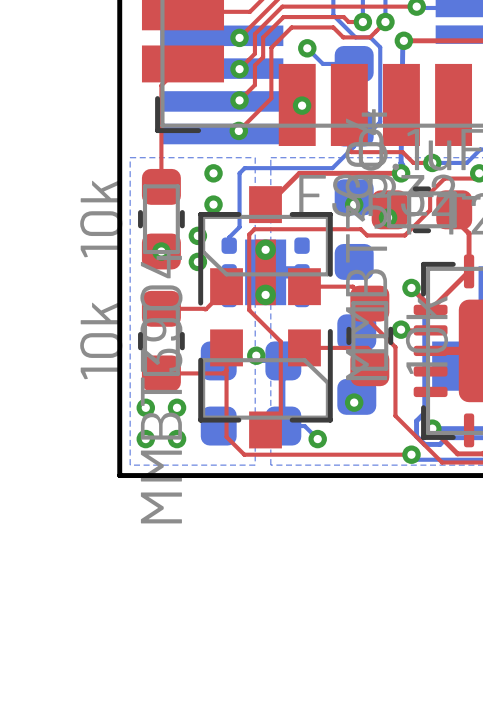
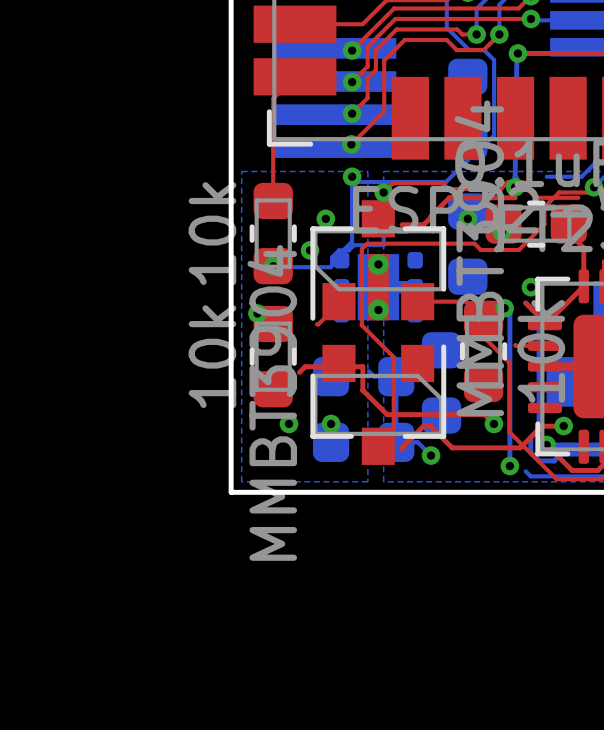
bottom track: (307, 48) (322, 63) (354, 63) -> none
via: (307, 48) -> none
top track: (349, 104) (349, 150) (351, 152) (402, 152) (413, 162) (432, 162) -> none
via: (302, 105) -> none
via: (432, 162) -> none
via position: (213, 173) -> (352, 176)
top track: (401, 173) (299, 173) (262, 210) (257, 210) -> none
bottom track: none -> (383, 192) (383, 245) (354, 245) (348, 250) (339, 250) (332, 257) (330, 267) (283, 267)
top track: none -> (383, 192) (392, 183) (442, 183) (448, 189) (500, 189) (507, 182) (522, 182) (536, 197) (578, 197)
via: none -> (383, 192)
top track: none -> (515, 197) (449, 197) (423, 224) (402, 224)
via: (197, 261) -> none
via position: (411, 287) -> (530, 287)
bottom track: none -> (504, 308) (509, 313) (509, 466)
via: none -> (504, 308)
via: none -> (257, 313)
top track: (161, 308) (204, 308) -> none
via: (401, 329) -> none
top track: (226, 347) (226, 436) (244, 454) (411, 454) -> none
top track: (304, 347) (367, 347) (369, 350) (369, 368) -> none
via: (256, 355) -> none
top track: none -> (299, 372) (305, 366) (362, 366) (362, 390) (387, 414) (484, 414) (493, 423)
part position: (356, 364) -> (441, 382)
top track: (226, 370) (223, 373) (161, 373) -> none
via position: (354, 402) -> (493, 423)
via: (145, 407) -> none
via: none -> (331, 423)
via: none -> (563, 425)
top track: none -> (562, 426) (541, 426) (520, 447) (452, 447) (430, 425) (423, 425) (402, 449)
via: (145, 439) -> none
via: (177, 439) -> none
via position: (411, 454) -> (509, 466)

